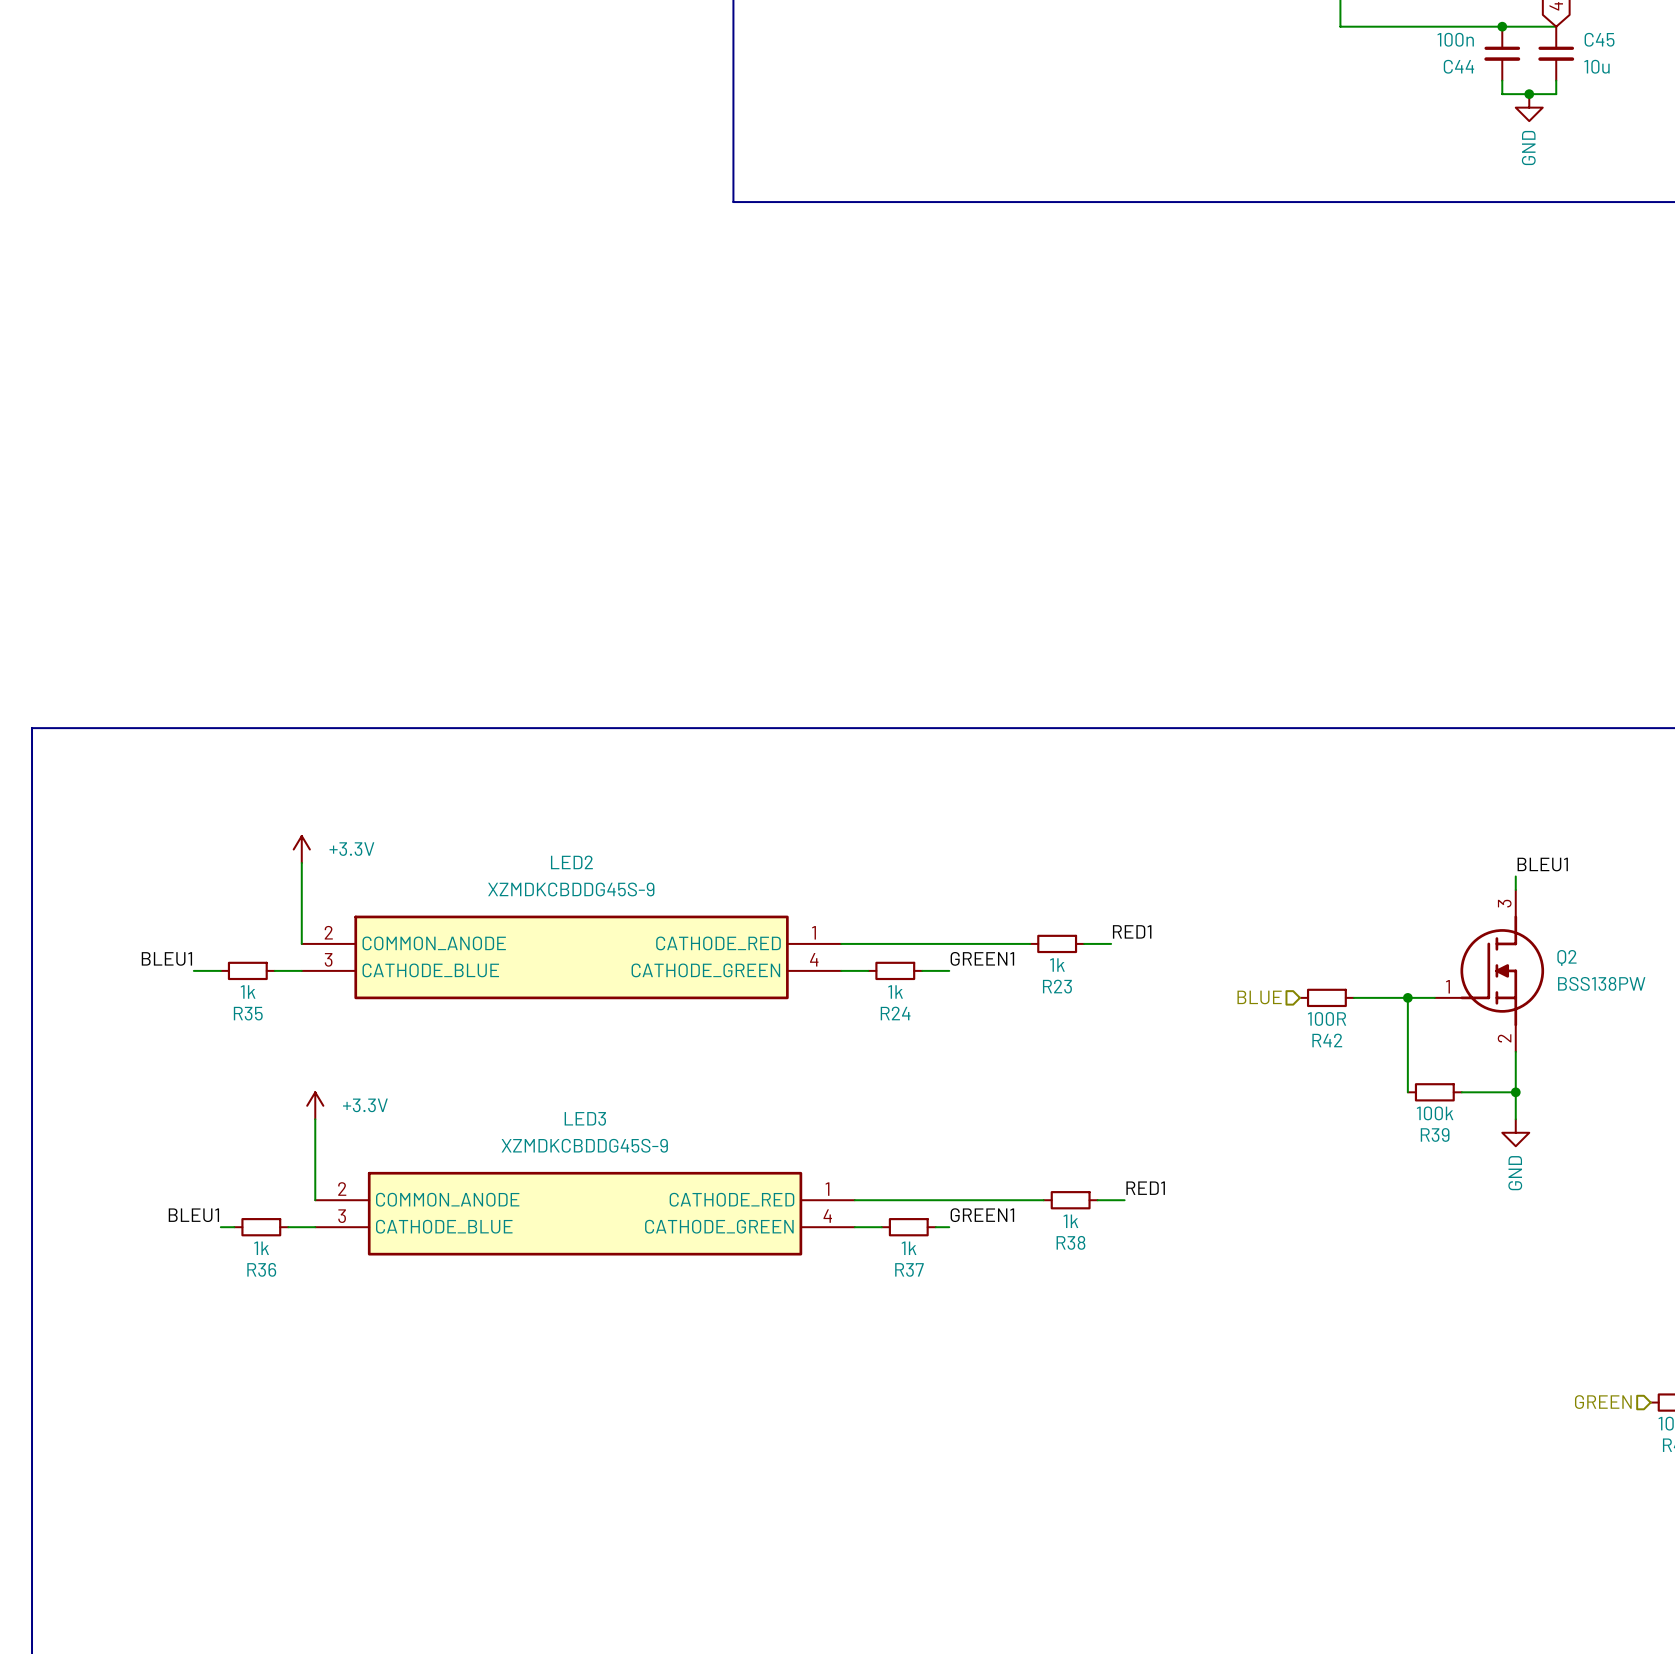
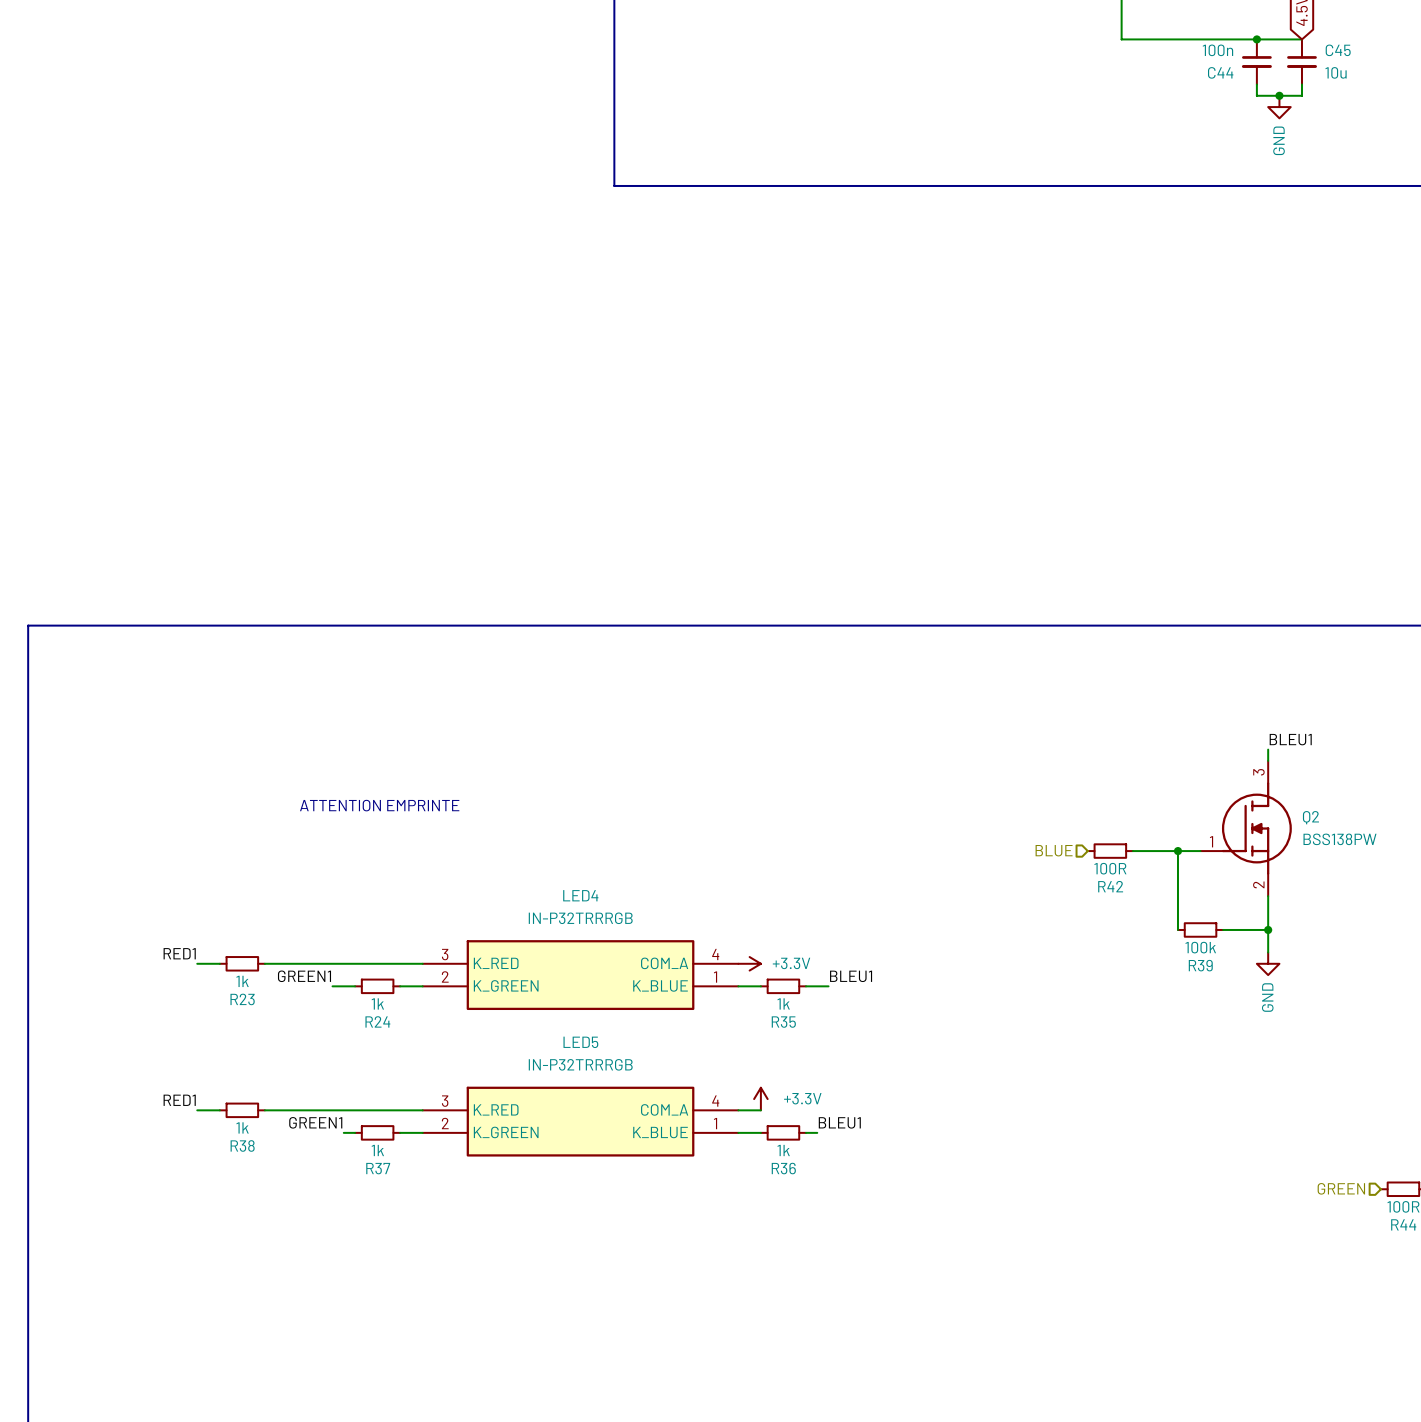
power symbol: +3.3V (301, 849) -> none
wire: (301, 863) (301, 943) -> none
label: RED1 (1132, 931) -> none
text: none -> ATTENTION EMPRINTE (379, 805)
wire: (841, 943) (1030, 943) -> none
R23 position: (1057, 943) -> (242, 963)
wire: (1084, 943) (1111, 943) -> none
LED2: XZMDKCBDDG45S-9 (571, 957) -> none
label: BLEU1 (166, 958) -> none
label: GREEN1 (982, 958) -> none
wire: (193, 970) (220, 970) -> (197, 963) (219, 963)
R35 position: (247, 970) -> (783, 986)
wire: (274, 970) (301, 970) -> none
wire: (841, 970) (868, 970) -> (738, 986) (760, 986)
R24 position: (895, 970) -> (377, 986)
wire: (922, 970) (949, 970) -> (805, 986) (828, 986)
power symbol: +3.3V (315, 1105) -> none
wire: (315, 1119) (315, 1200) -> none
label: none -> RED1 (179, 953)
wire: none -> (264, 963) (422, 963)
power symbol: none -> +3.3V (749, 963)
LED4: none -> IN-P32TRRRGB (580, 975)
label: none -> GREEN1 (304, 976)
label: none -> BLEU1 (851, 976)
wire: none -> (400, 986) (422, 986)
label: RED1 (1145, 1188) -> none
wire: (854, 1200) (1043, 1200) -> none
R38 position: (1070, 1200) -> (242, 1110)
wire: (1097, 1200) (1124, 1200) -> (738, 1110) (760, 1110)
LED3: XZMDKCBDDG45S-9 (585, 1213) -> none
label: BLEU1 (193, 1215) -> none
label: GREEN1 (982, 1215) -> none
wire: (220, 1227) (234, 1227) -> (343, 1132) (355, 1132)
R36 position: (261, 1227) -> (783, 1132)
wire: (288, 1227) (315, 1227) -> (332, 986) (355, 986)
wire: (854, 1227) (881, 1227) -> (738, 1132) (760, 1132)
R37 position: (908, 1227) -> (377, 1132)
wire: (935, 1227) (949, 1227) -> (805, 1132) (817, 1132)
power symbol: none -> +3.3V (760, 1099)
label: none -> RED1 (179, 1100)
wire: none -> (197, 1110) (219, 1110)
wire: none -> (264, 1110) (422, 1110)
LED5: none -> IN-P32TRRRGB (580, 1121)
label: none -> GREEN1 (315, 1122)
label: none -> BLEU1 (839, 1122)
wire: none -> (400, 1132) (422, 1132)

